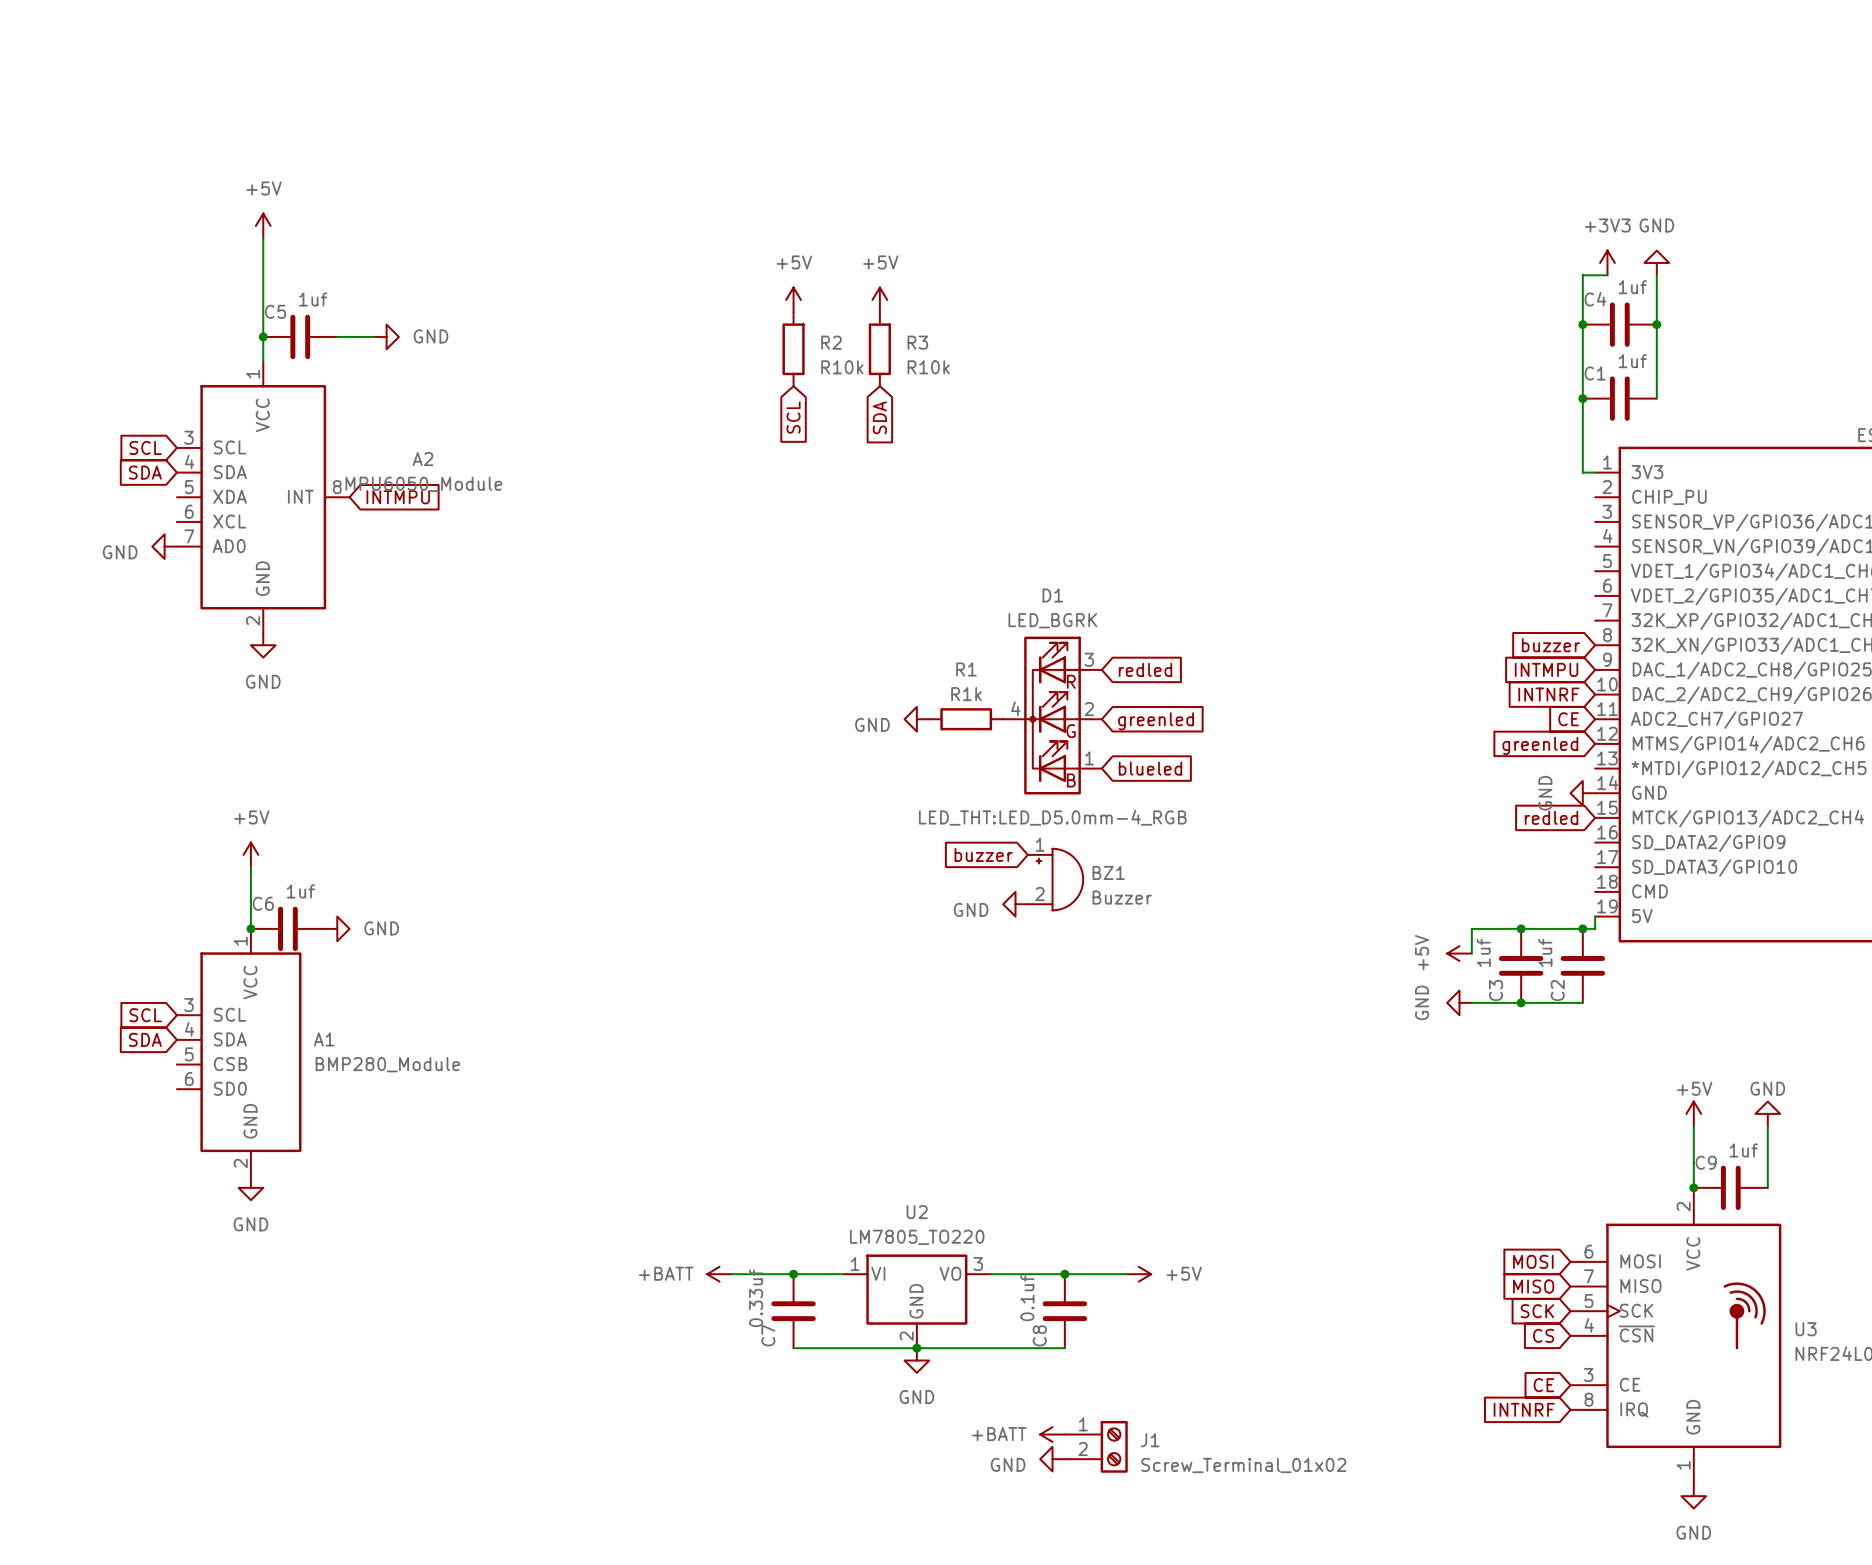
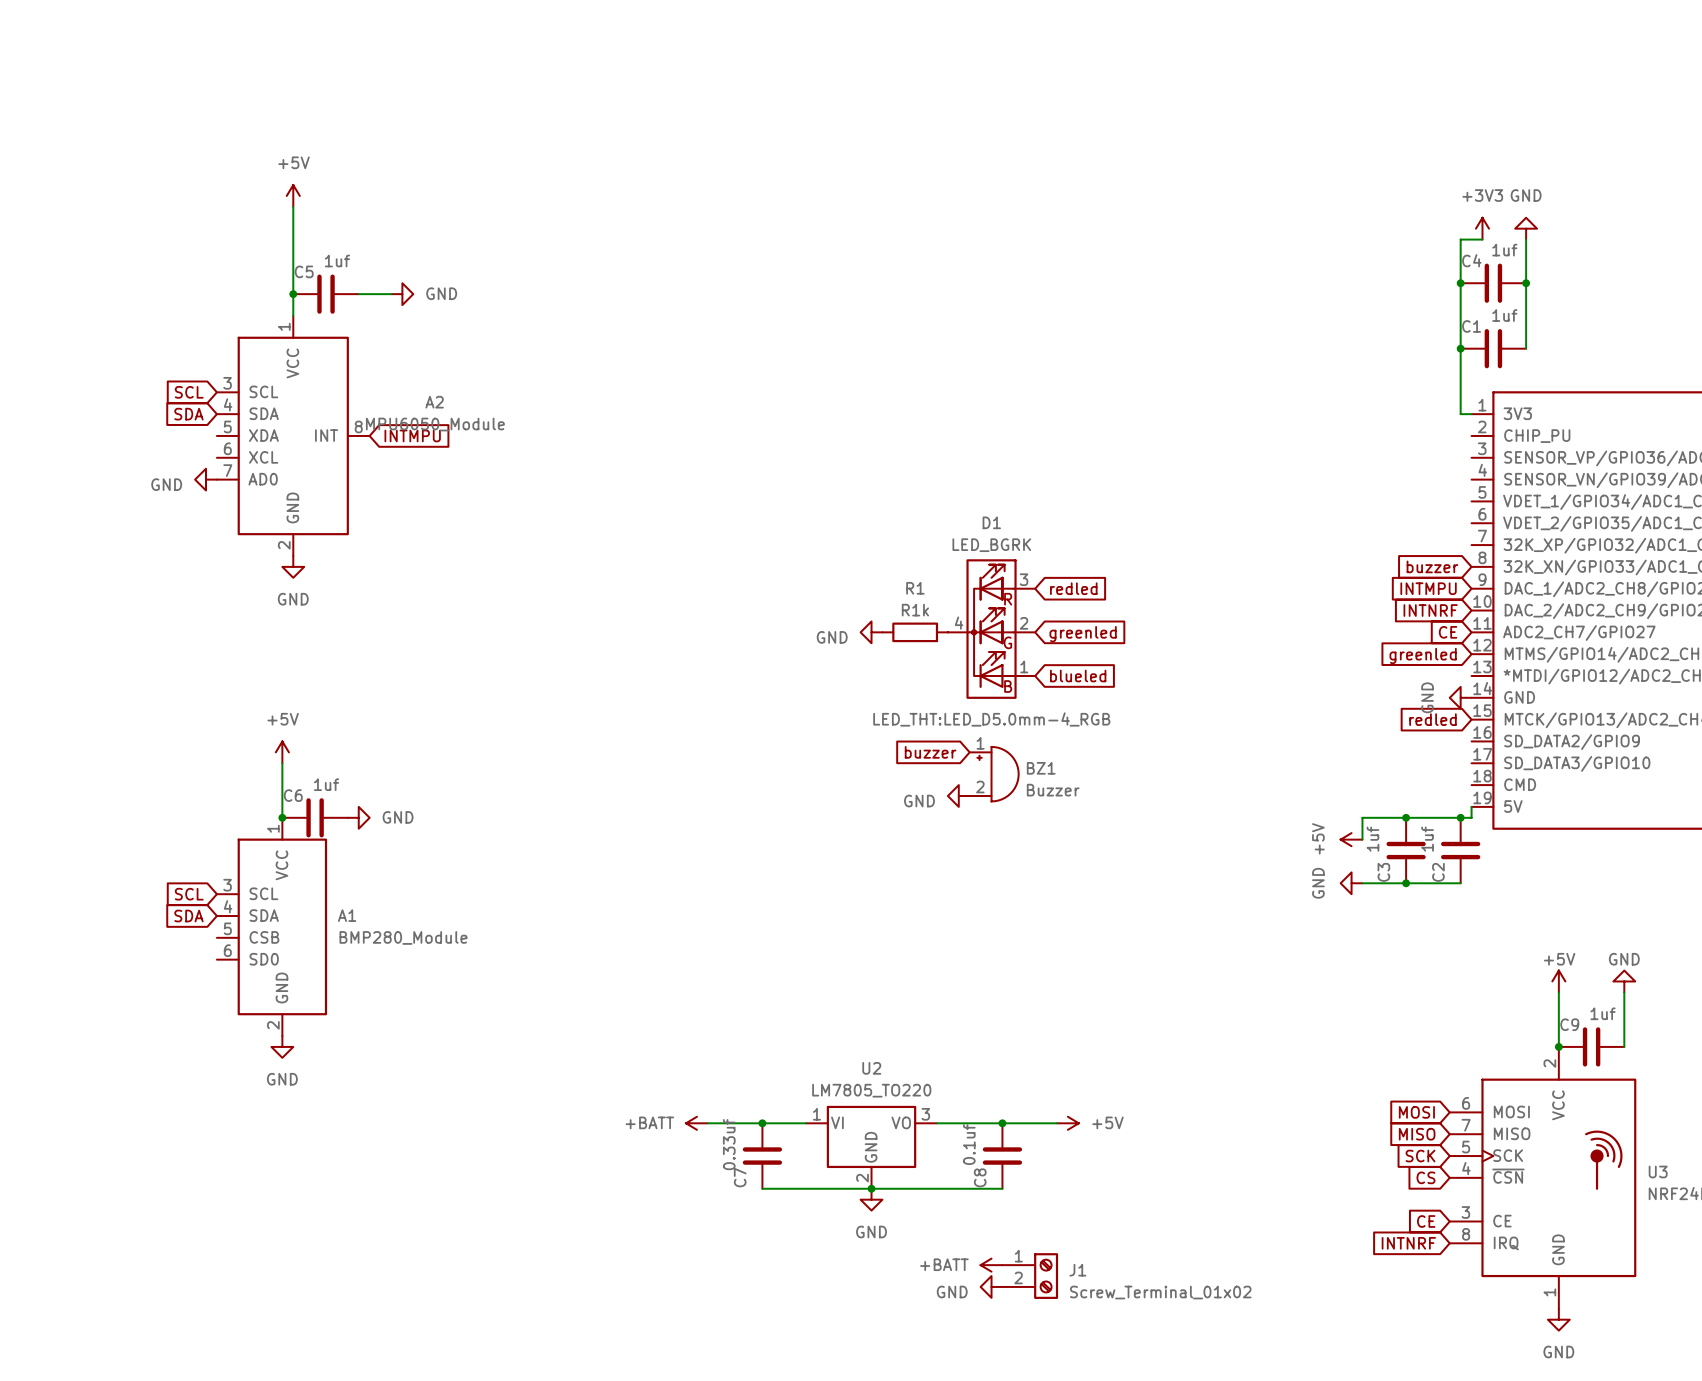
power symbol: +5V (793, 299) -> none
power symbol: +5V (879, 299) -> none
R2: R10k (793, 349) -> none
R3: R10k (879, 349) -> none
global label: SCL (793, 417) -> none
global label: SDA (879, 417) -> none

